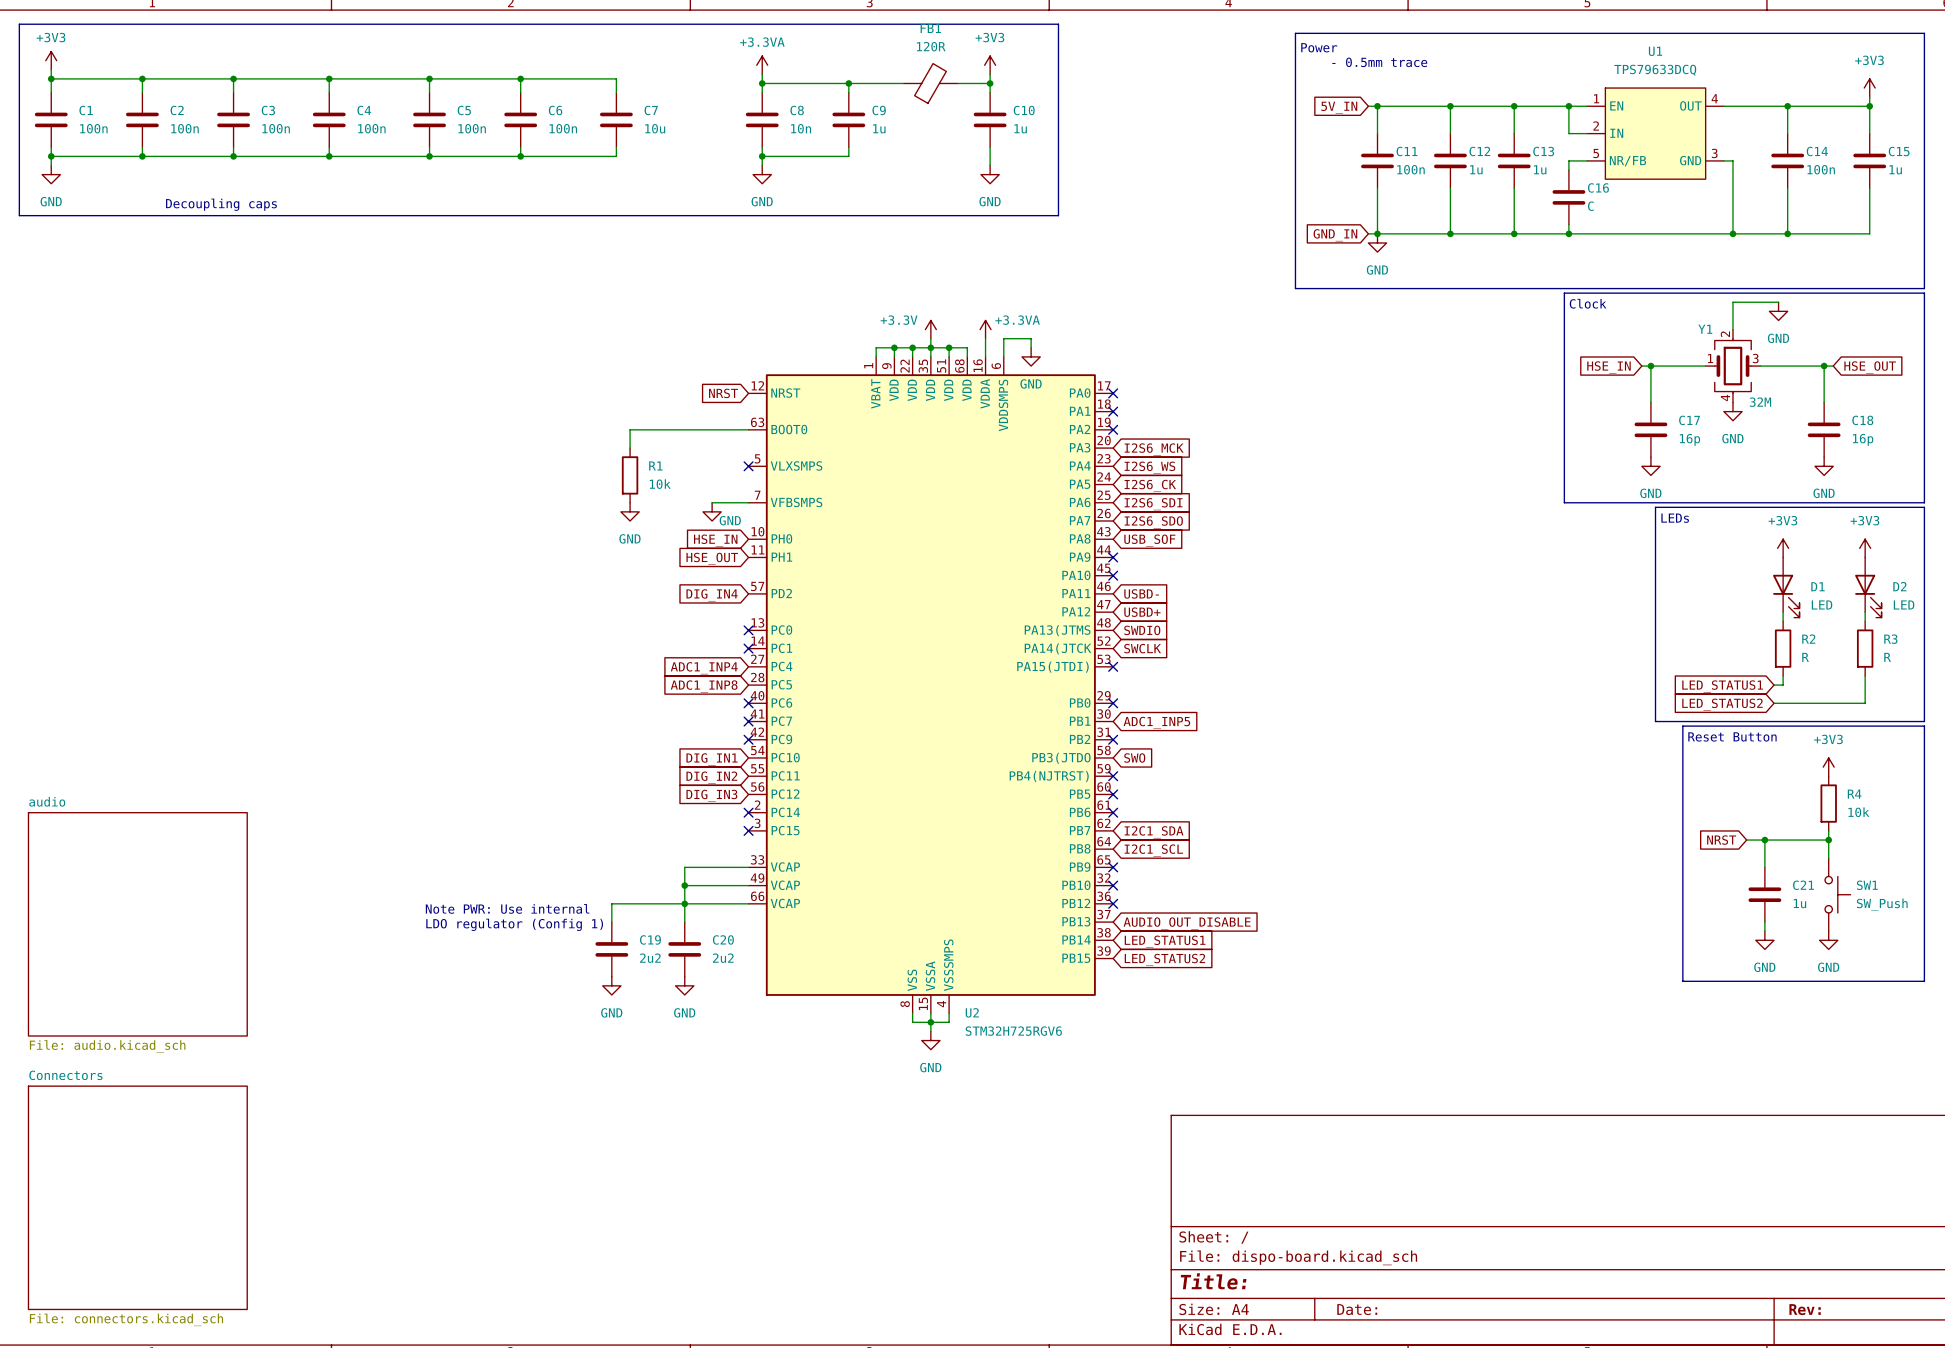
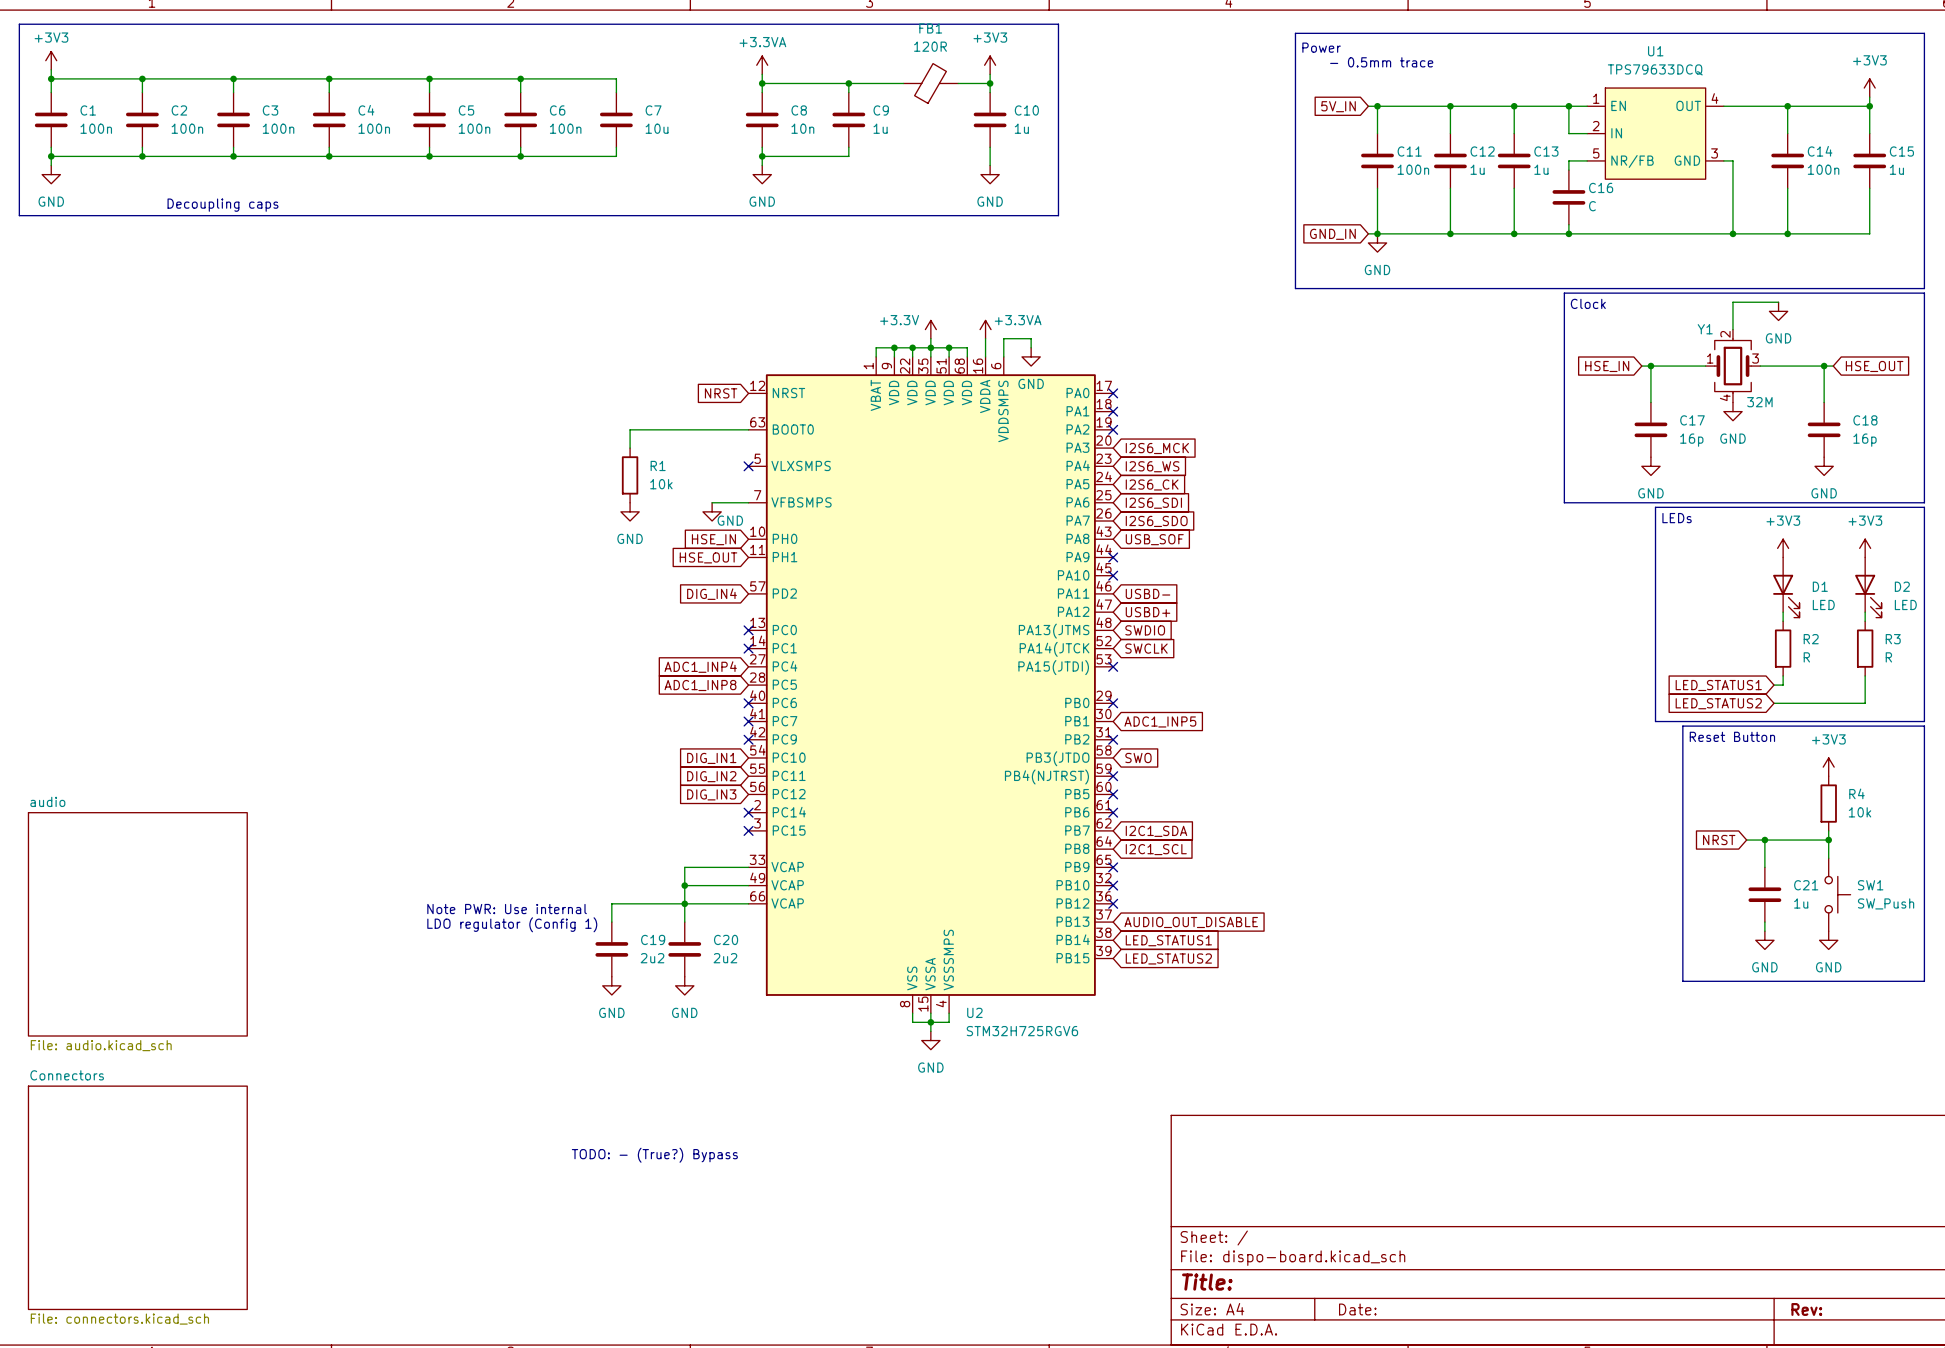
text: none -> TODO: - (True?) Bypass (654, 1155)

